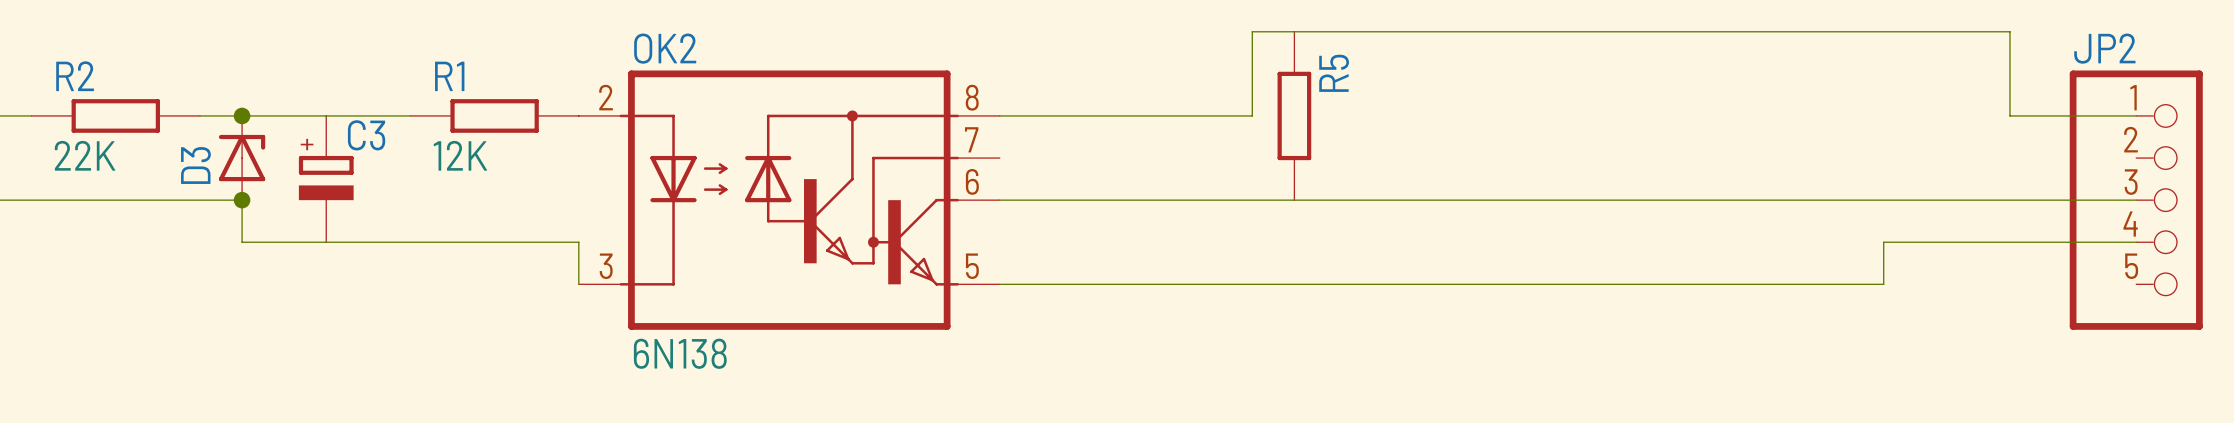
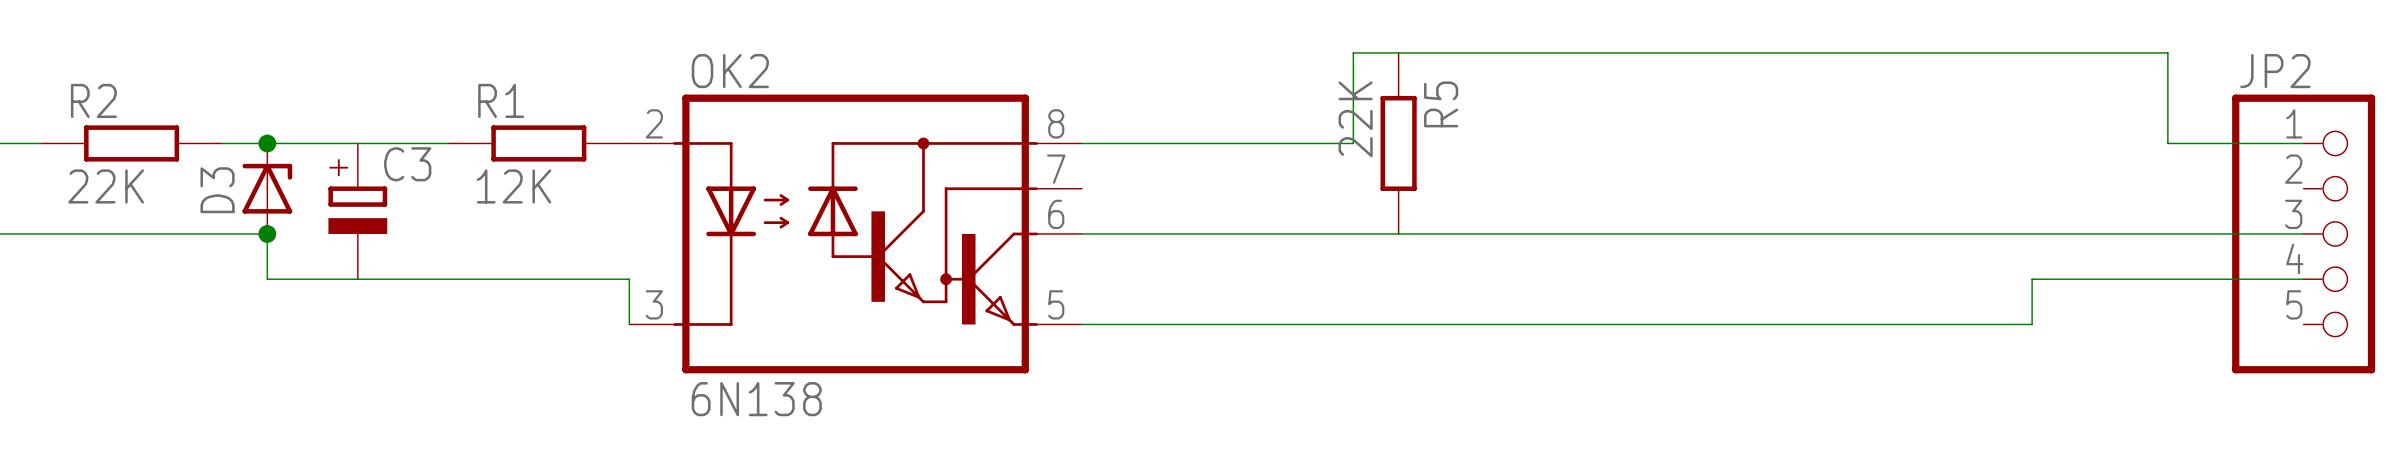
R5 value: none -> 22K (1355, 119)

